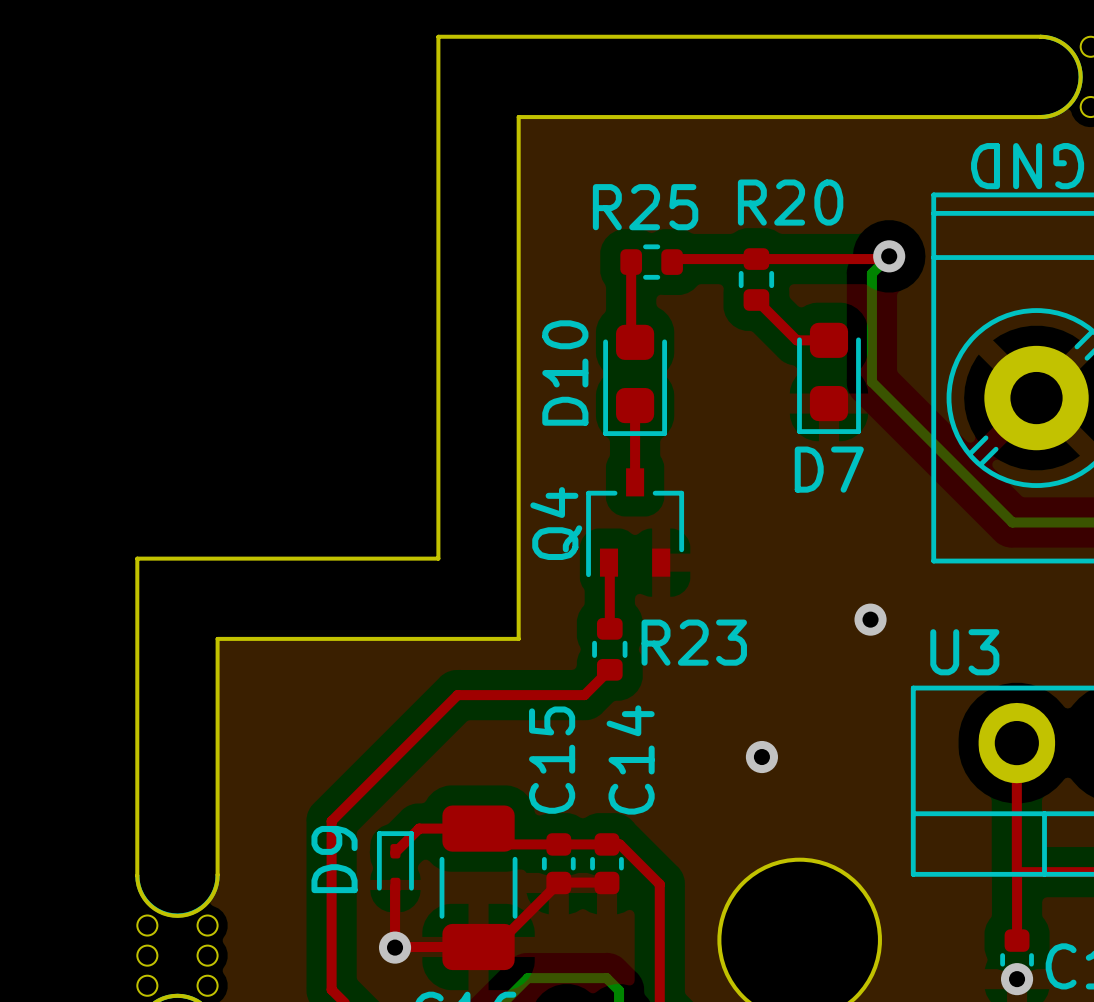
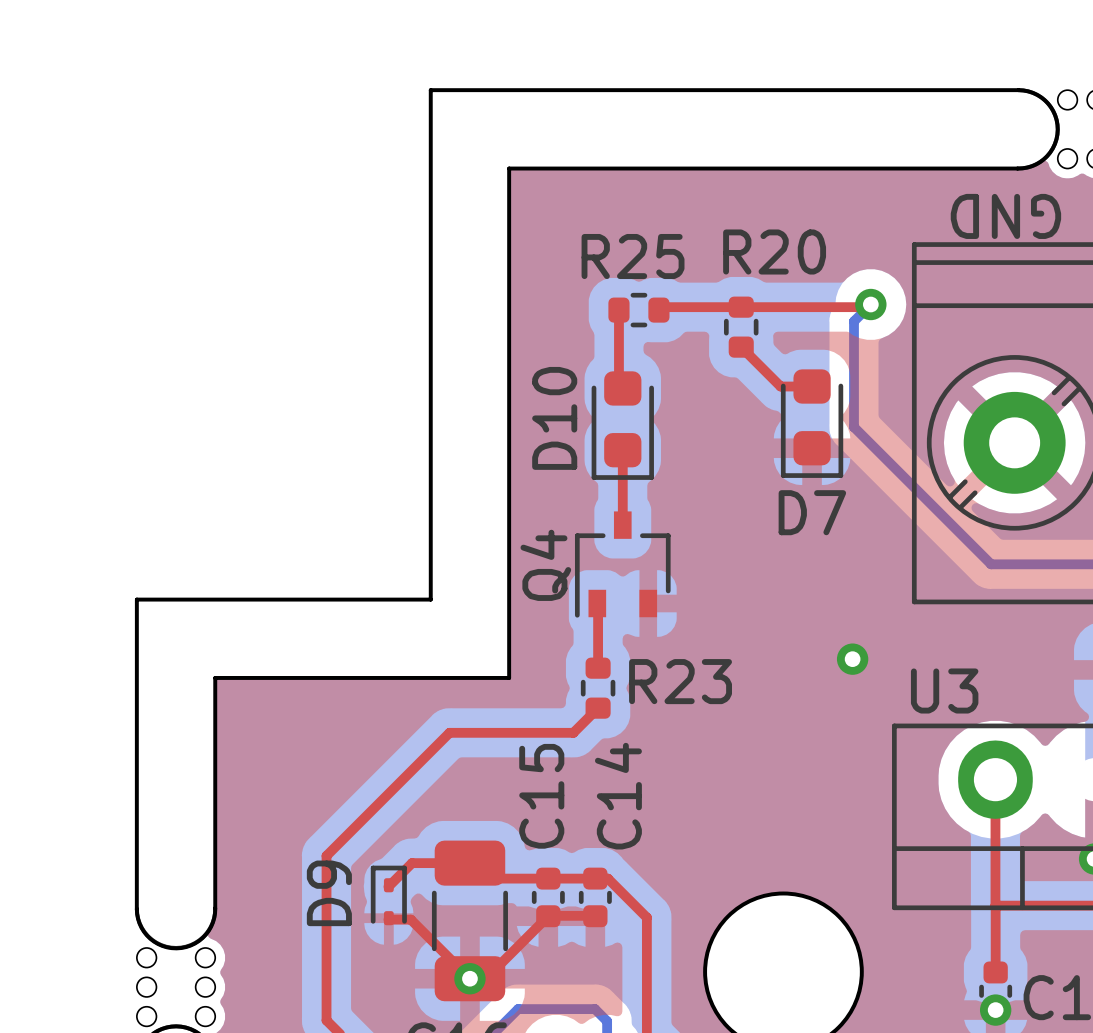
via: (761, 757) -> none
top track: (395, 886) (395, 947) (478, 947) -> (388, 919) (410, 919) (469, 978)
via position: (395, 947) -> (469, 978)

